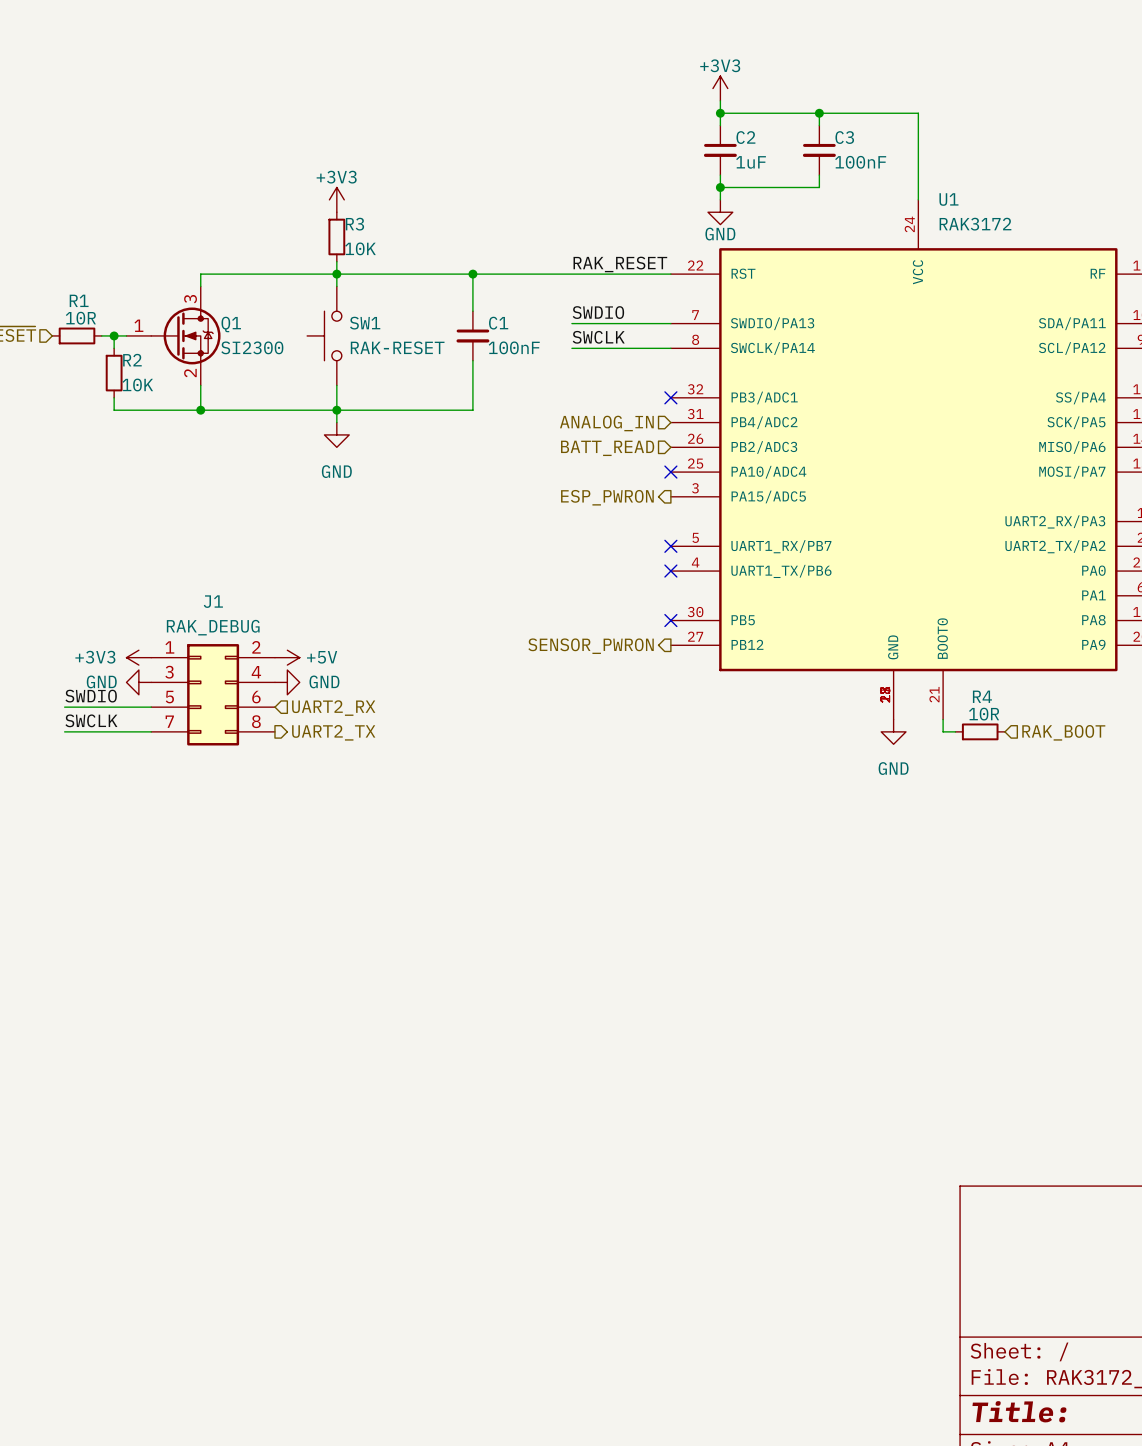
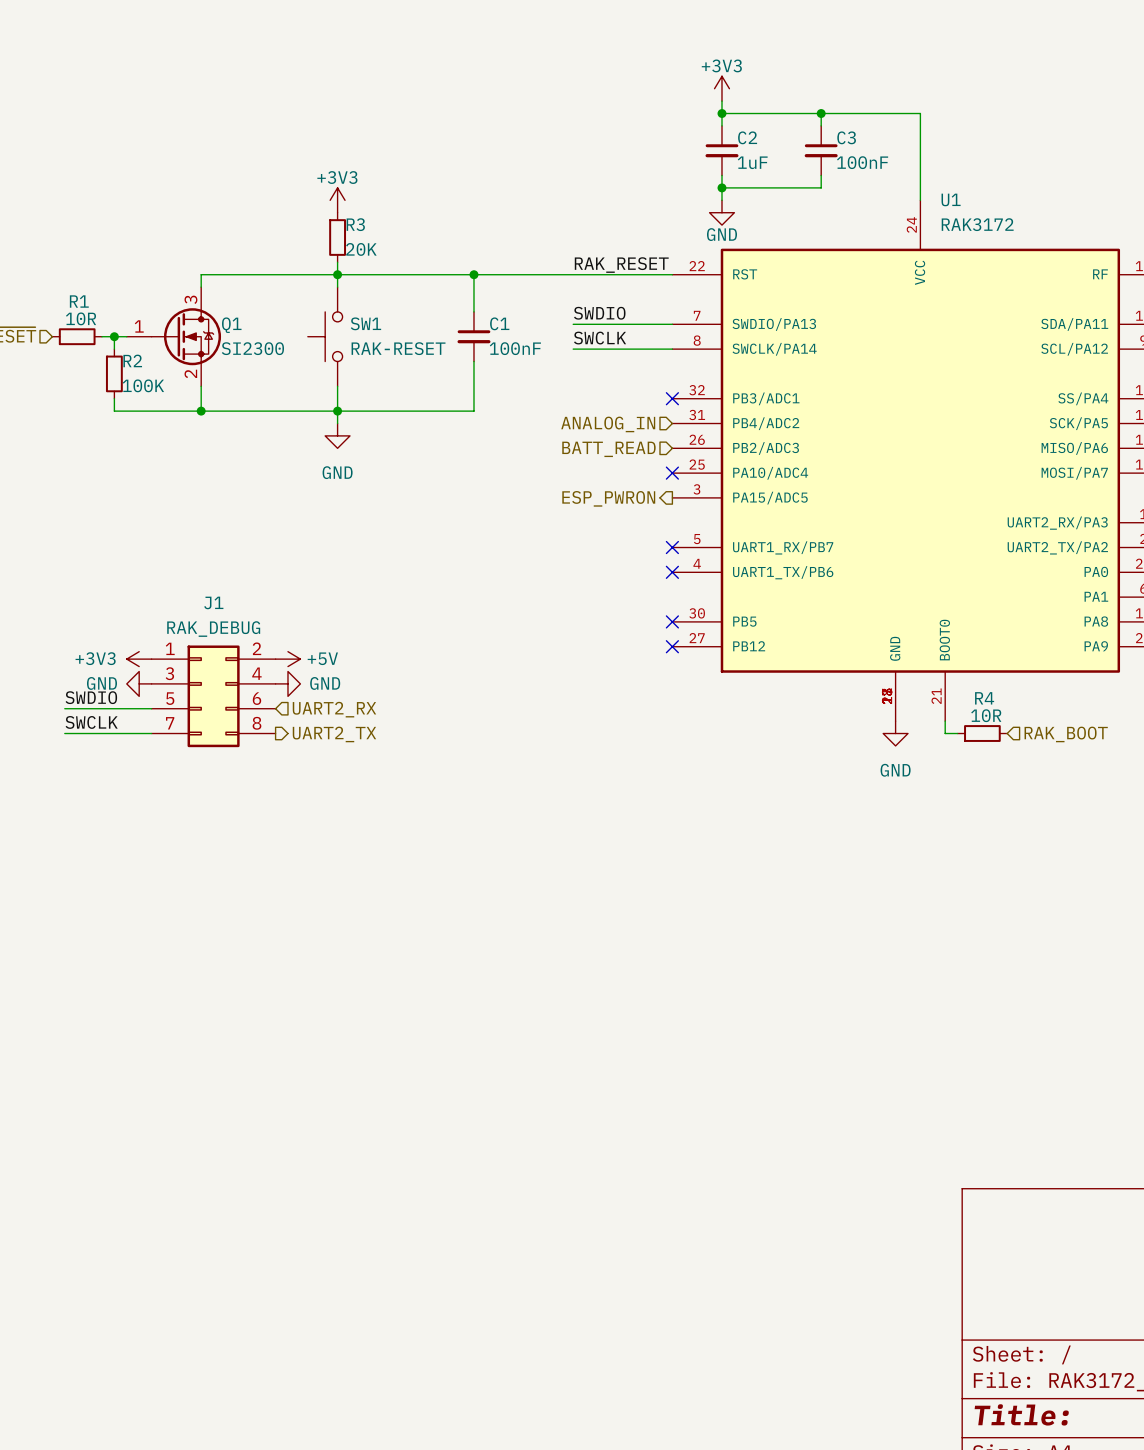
R3 value: 10K (360, 248) -> 20K (361, 249)
R2 value: 10K (137, 384) -> 100K (143, 385)
no-connect mark: none -> (672, 646)
hierarchical label: SENSOR_PWRON (591, 646) -> none

